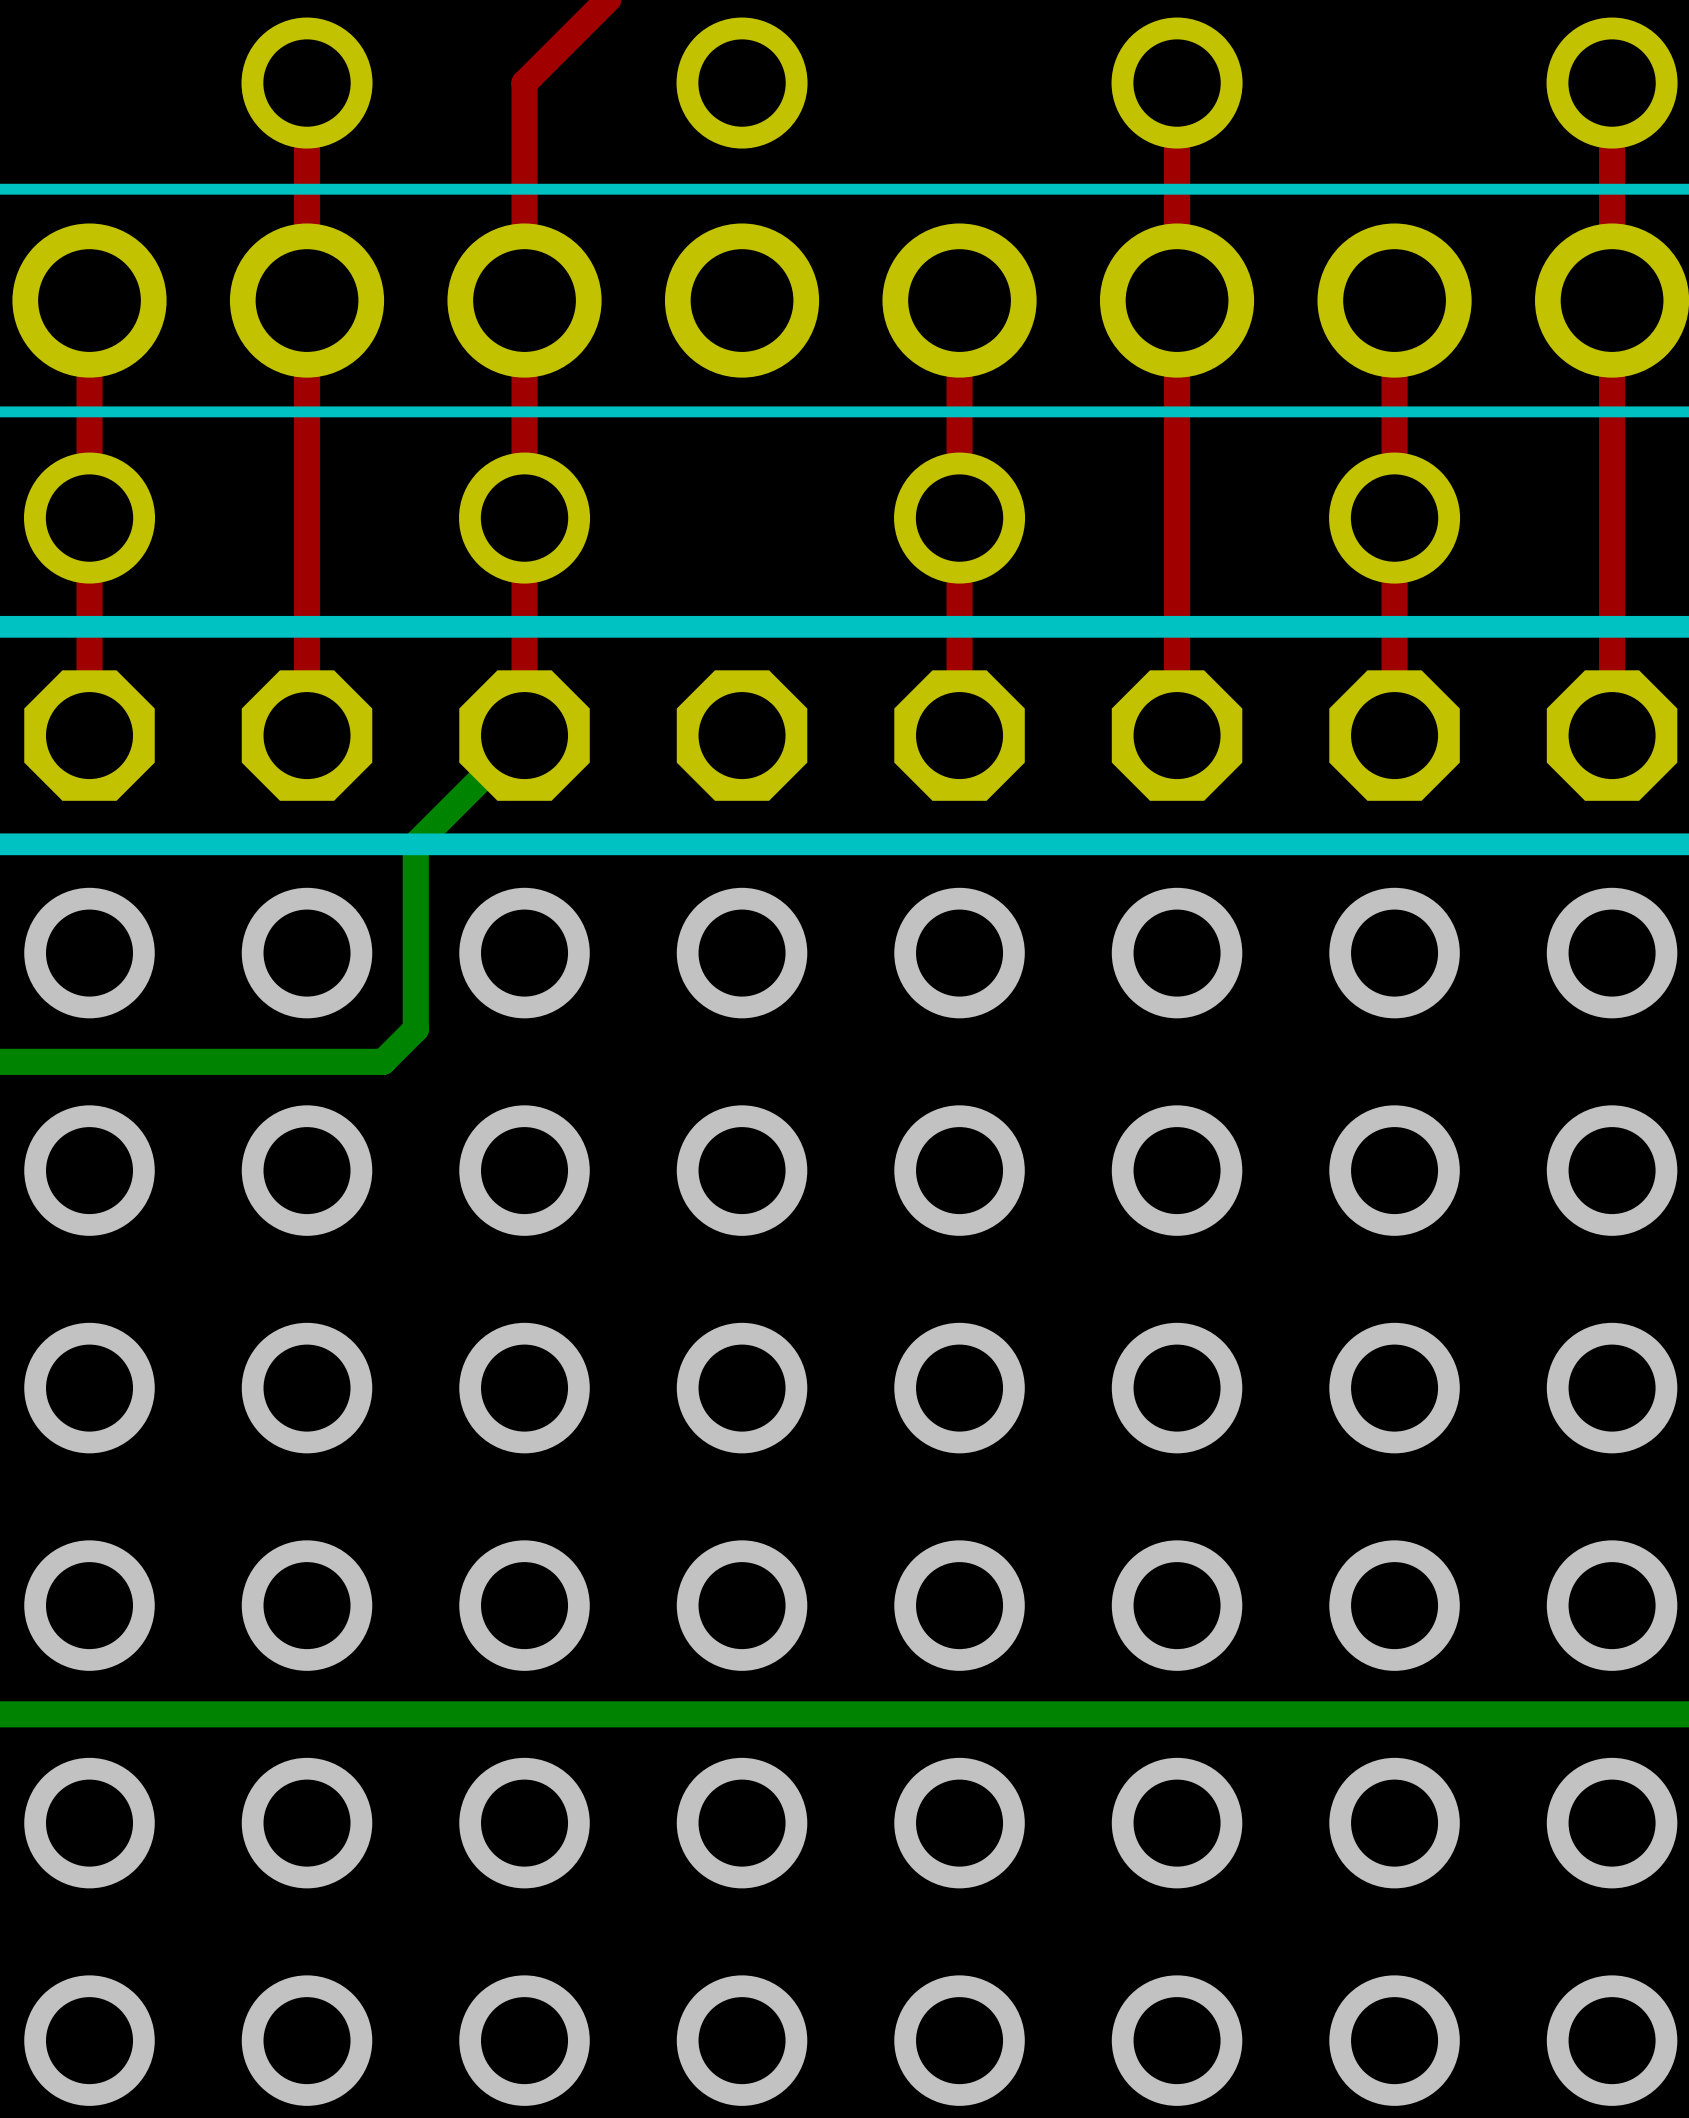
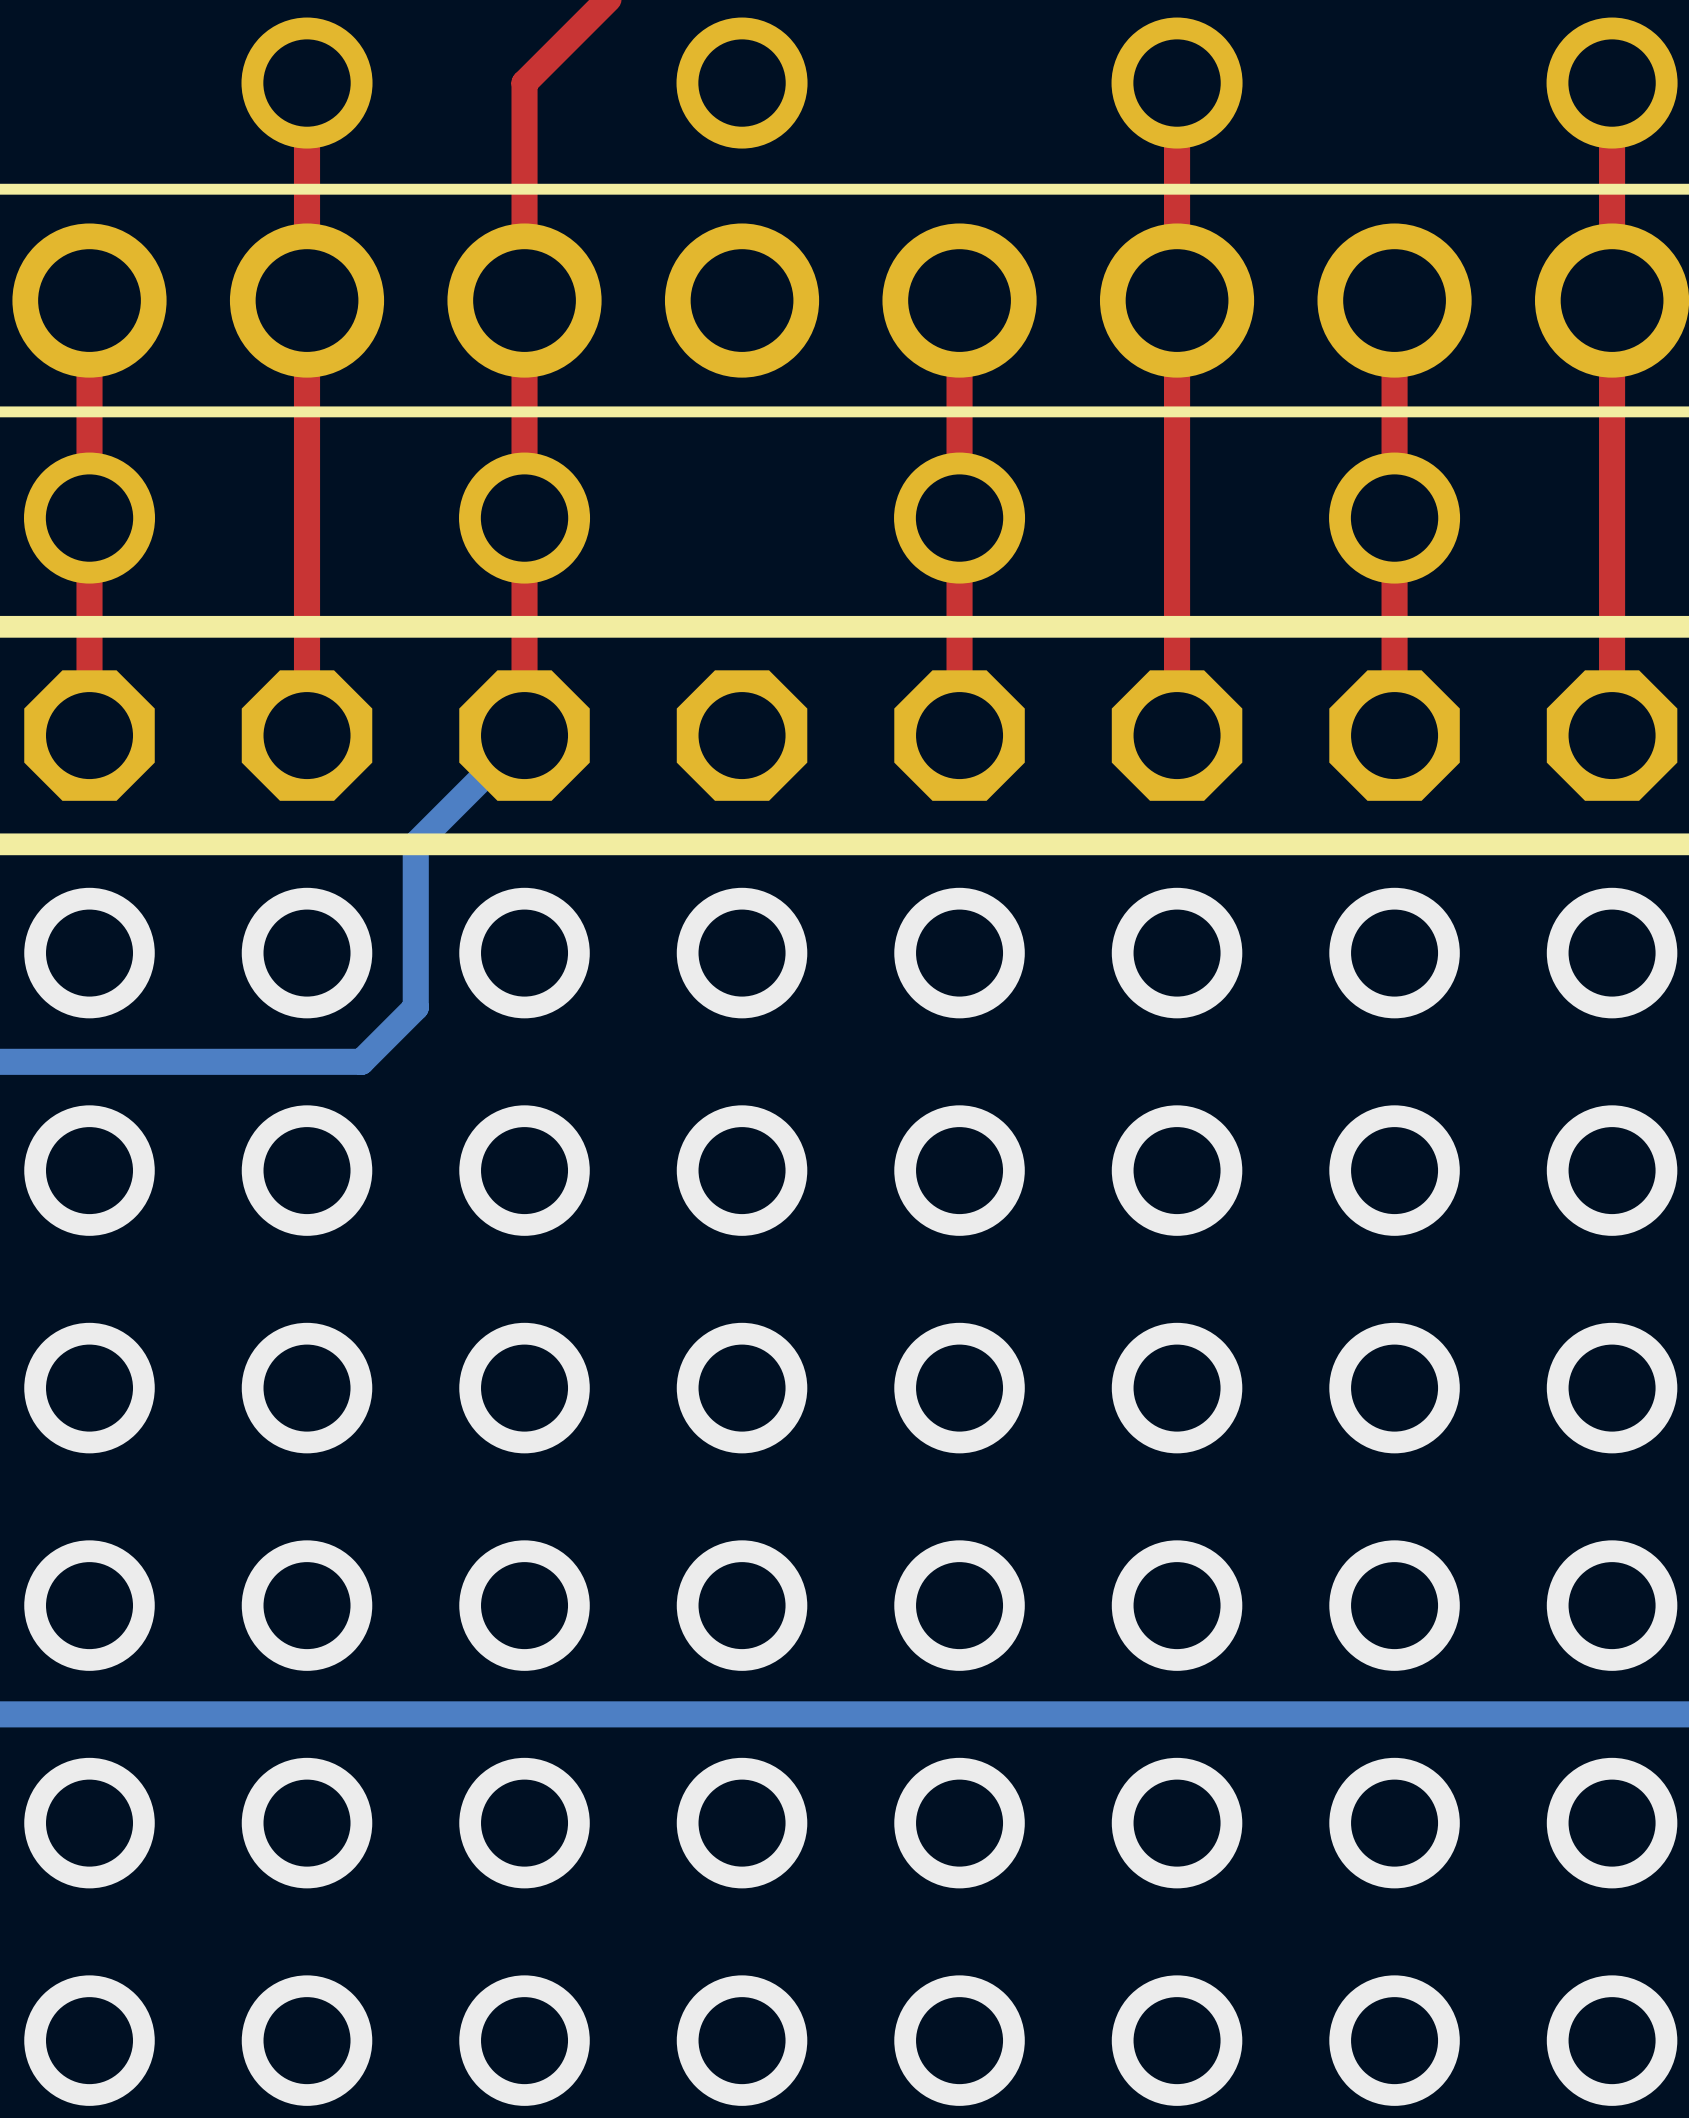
bottom track: (415, 1007) (415, 1029) (383, 1061) (361, 1061) -> (415, 1007) (361, 1061)

